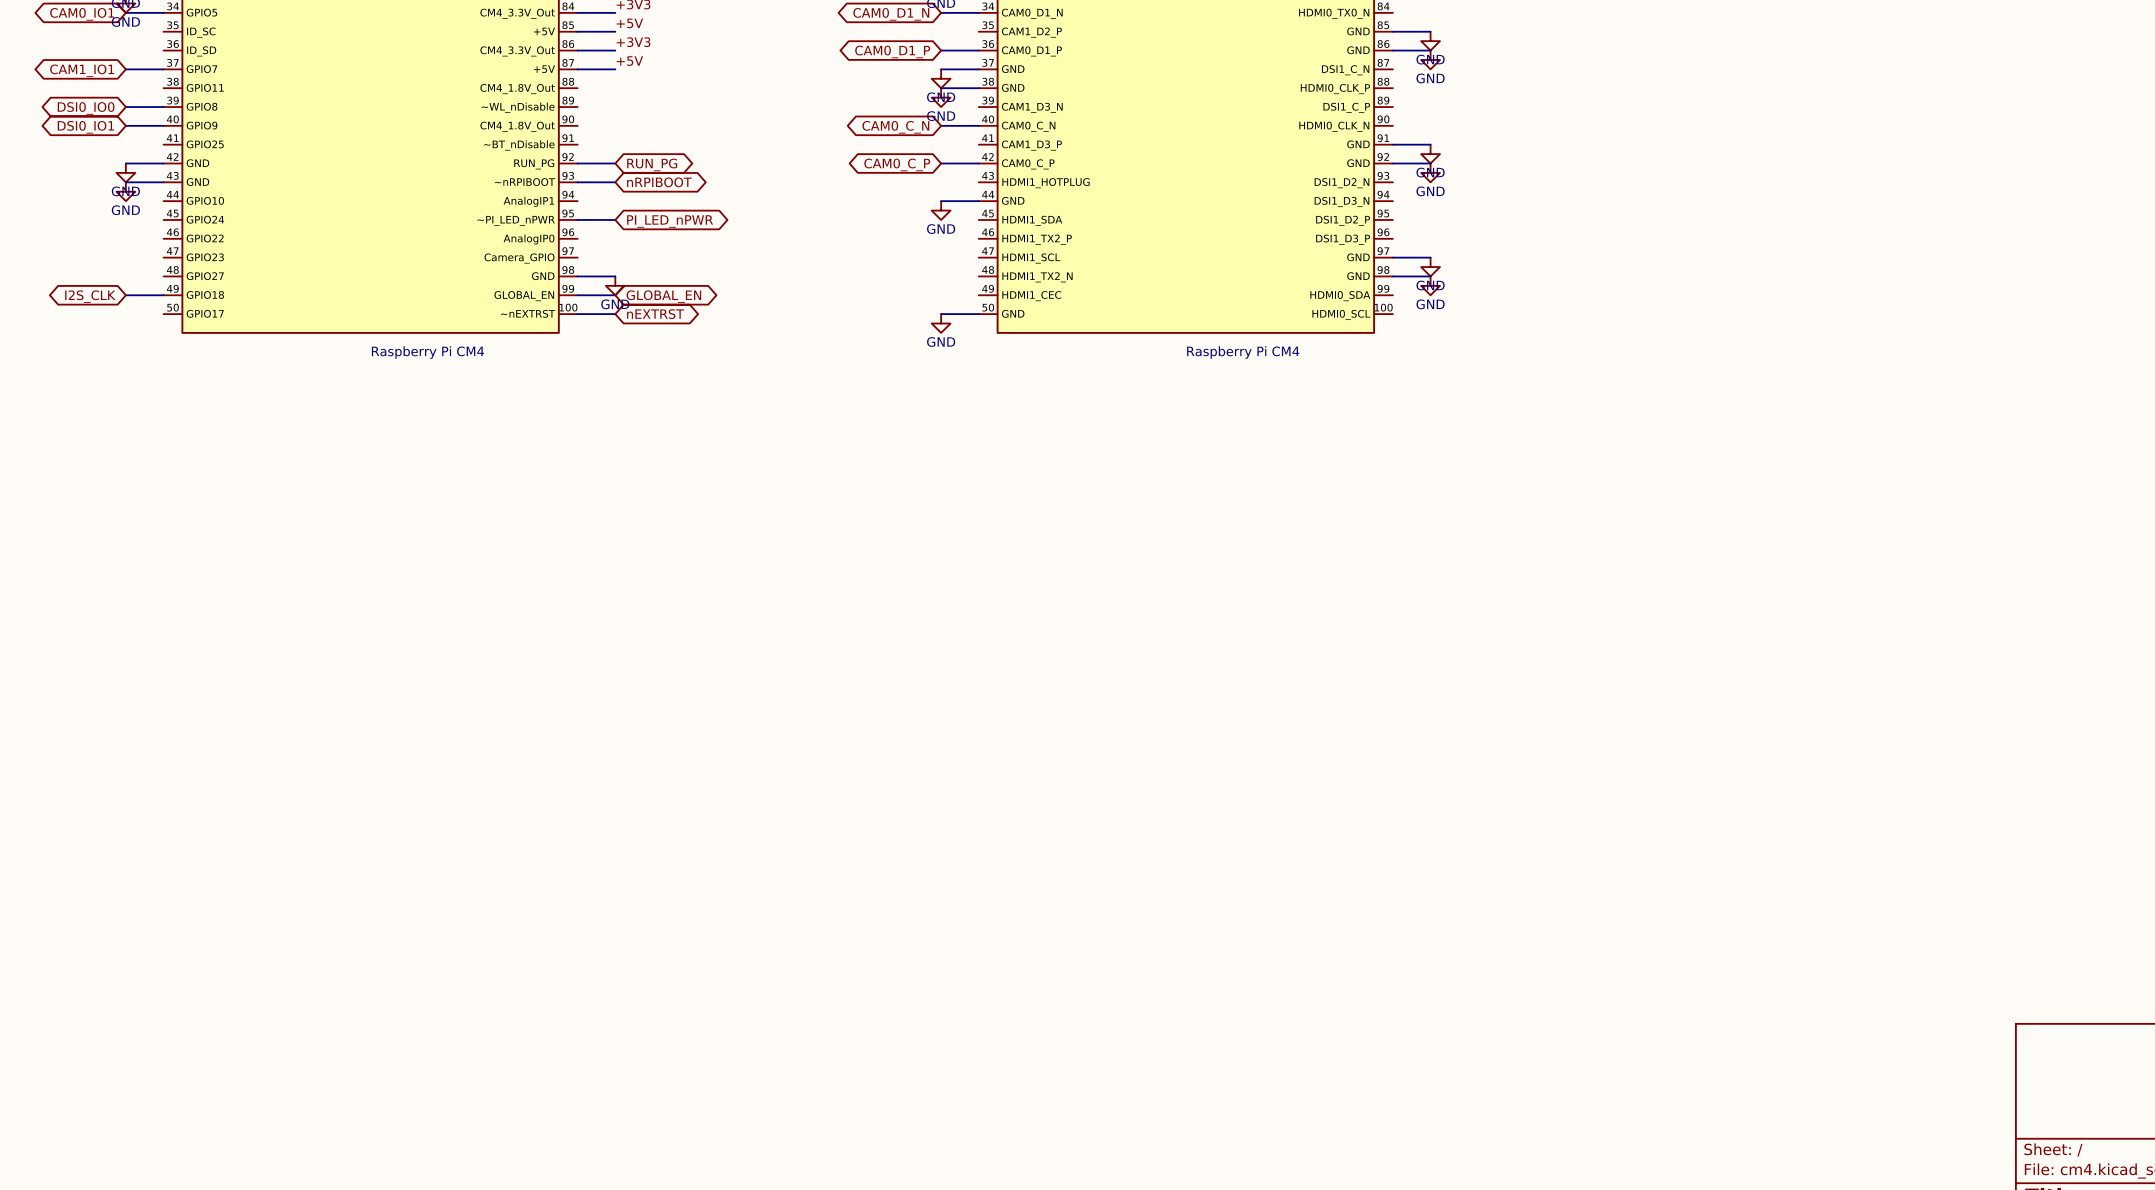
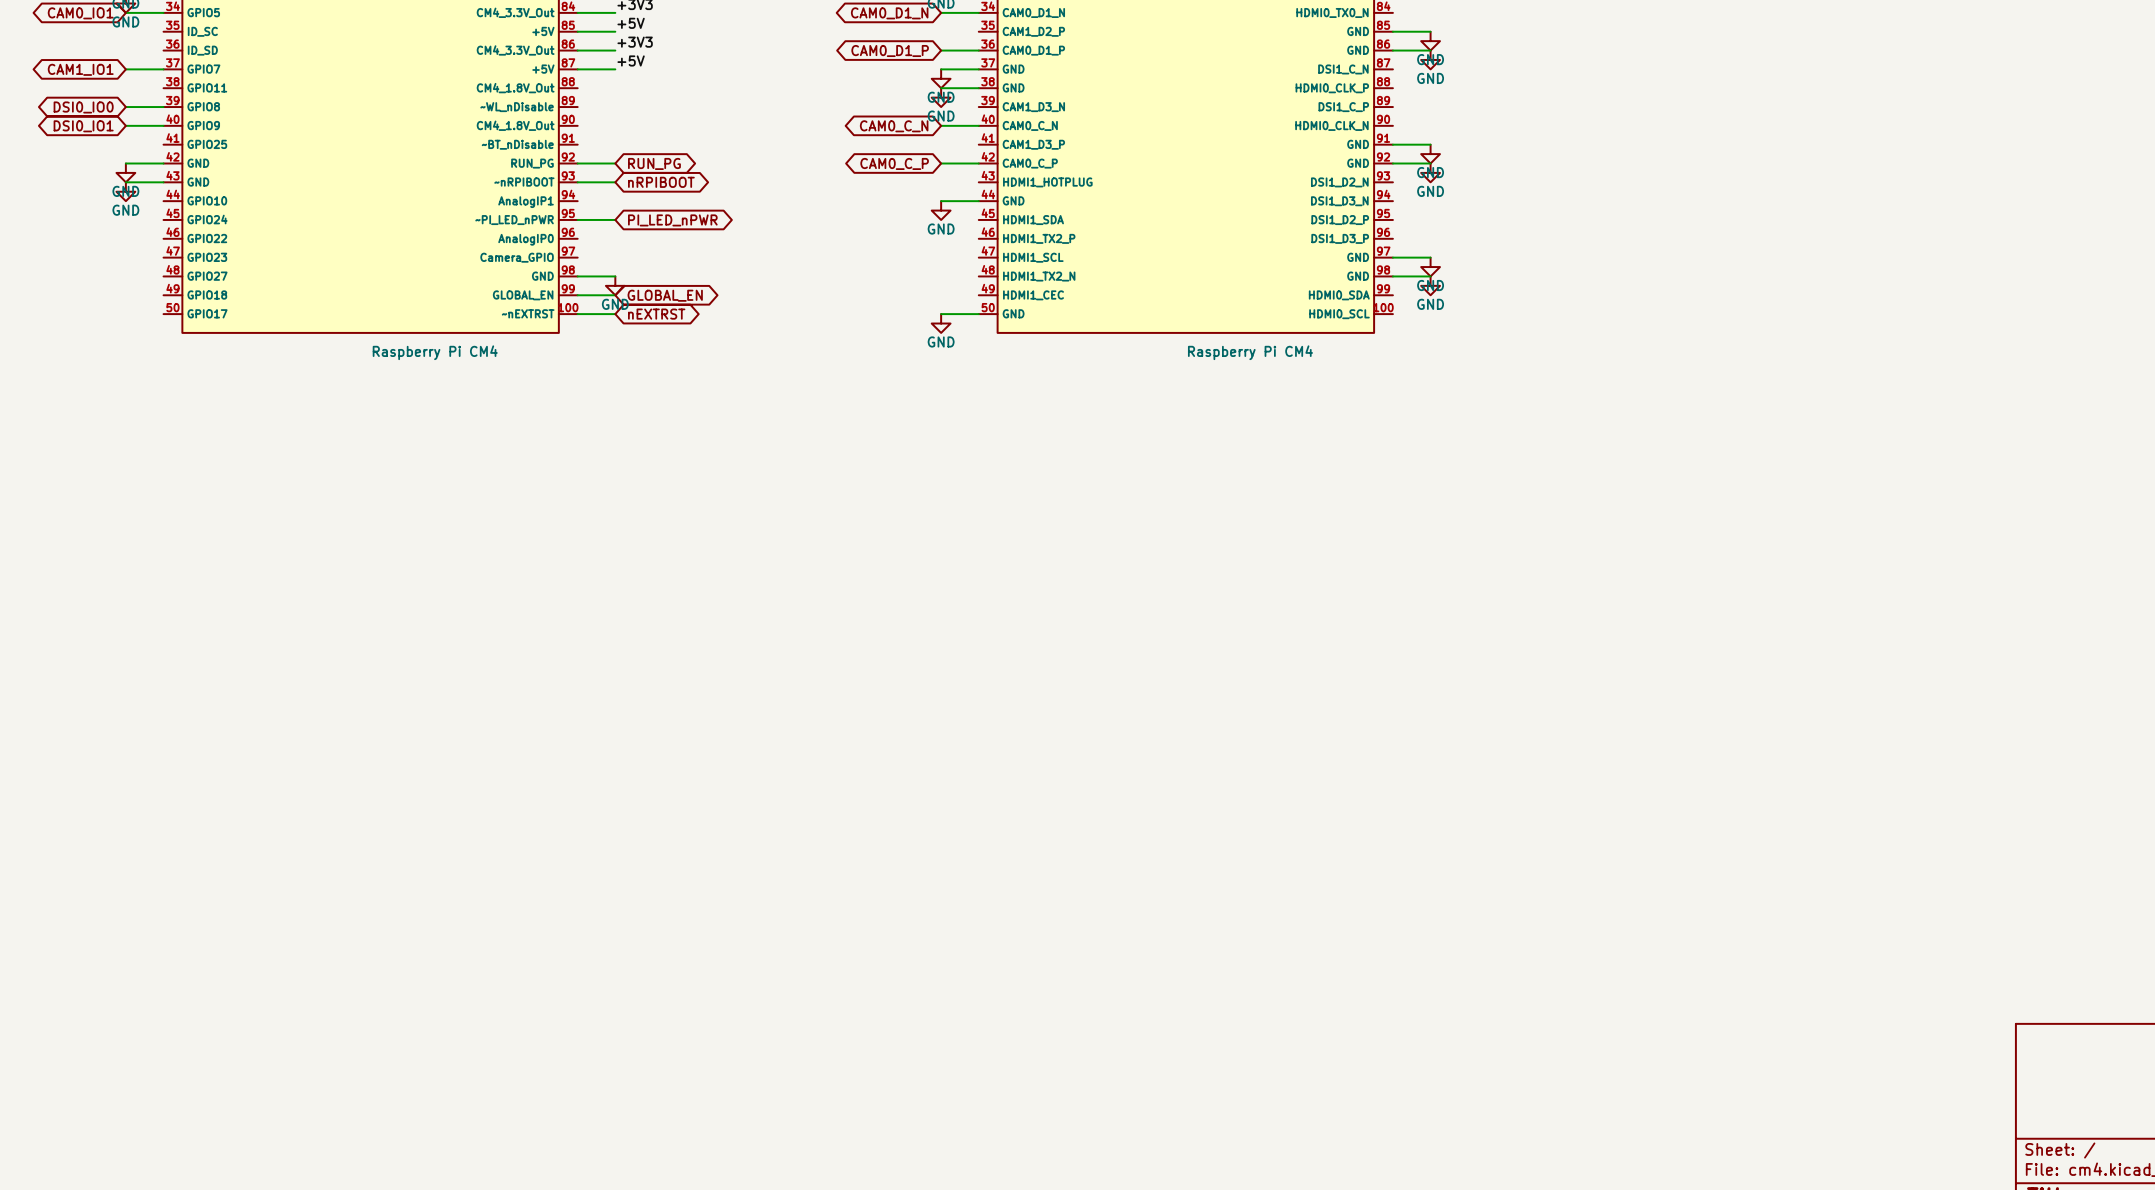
wire: (125, 295) (163, 295) -> none
global label: I2S_CLK (90, 296) -> none

